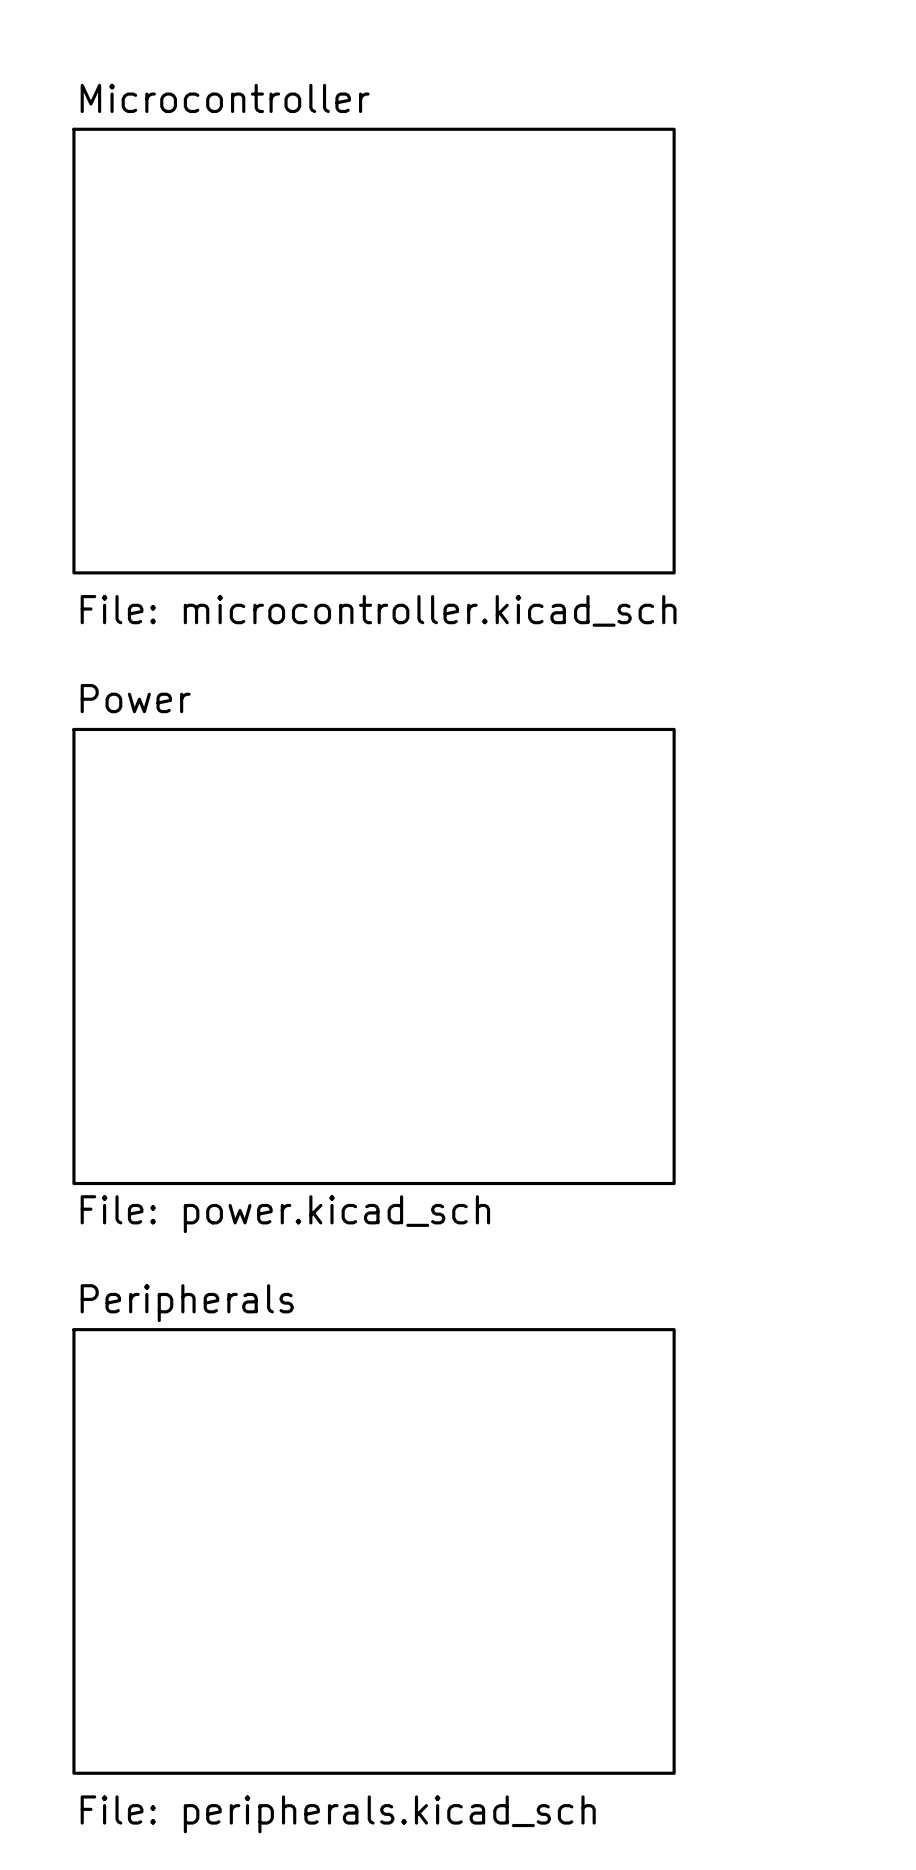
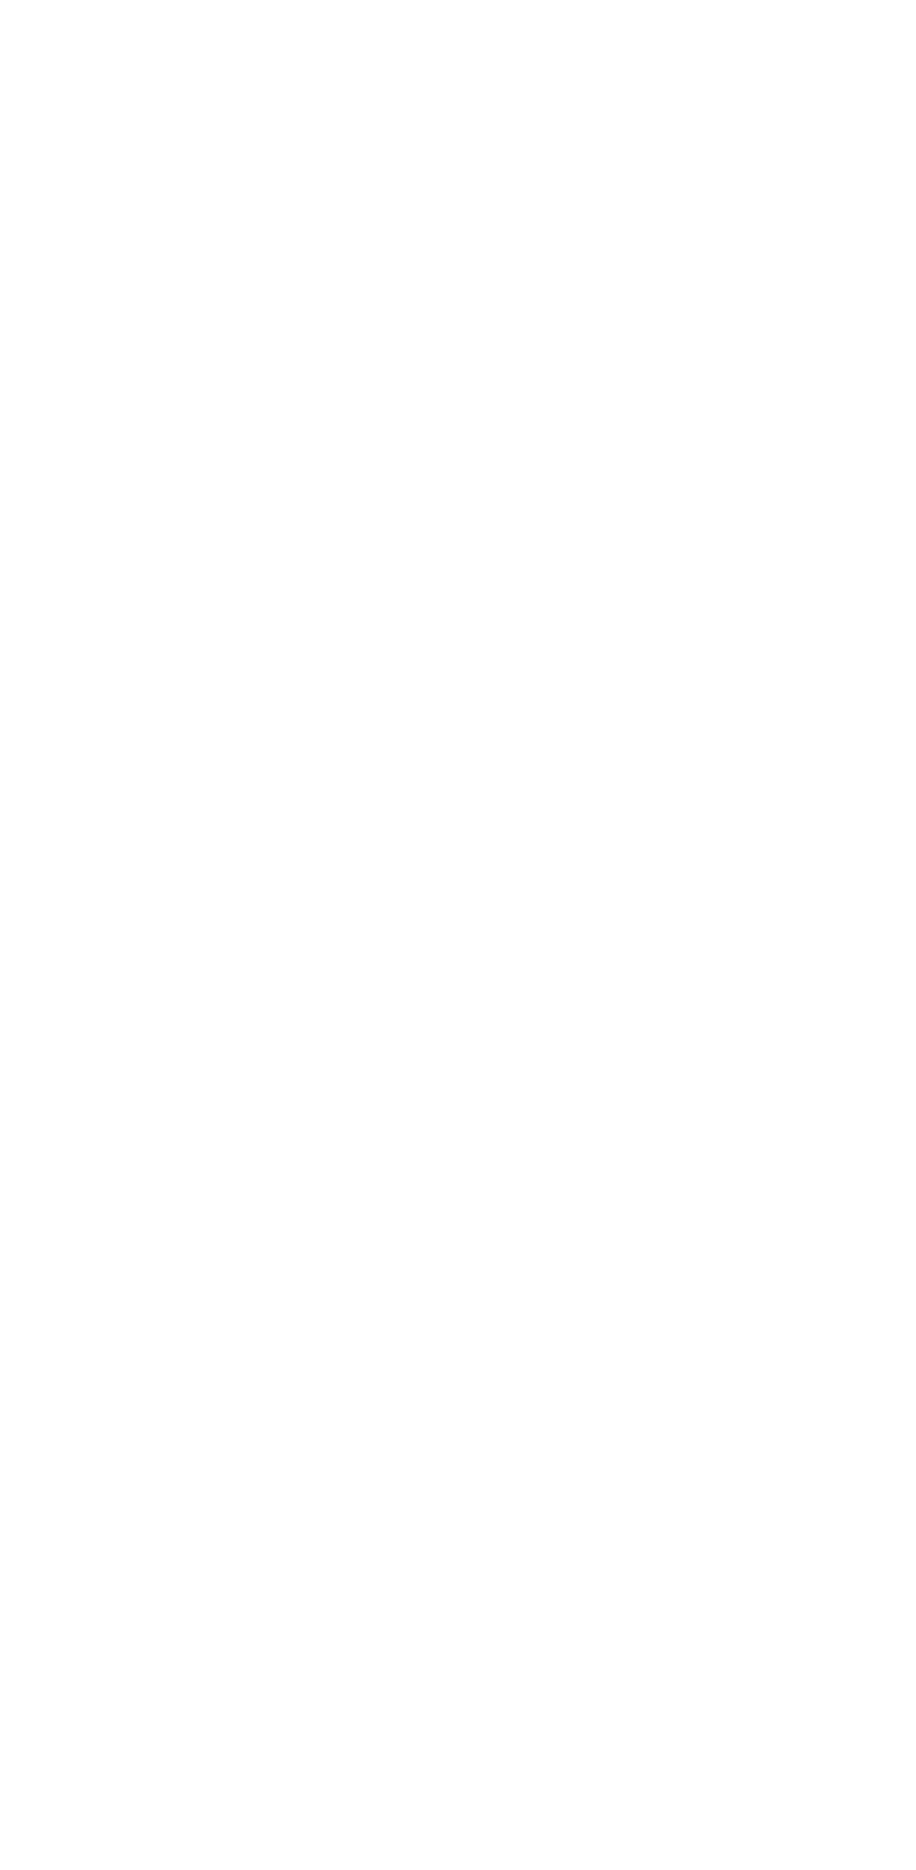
sheet Microcontroller: File: microcontroller.kicad_sch (374, 351) -> none
sheet Power: File: power.kicad_sch (374, 956) -> none
sheet Peripherals: File: peripherals.kicad_sch (374, 1551) -> none

